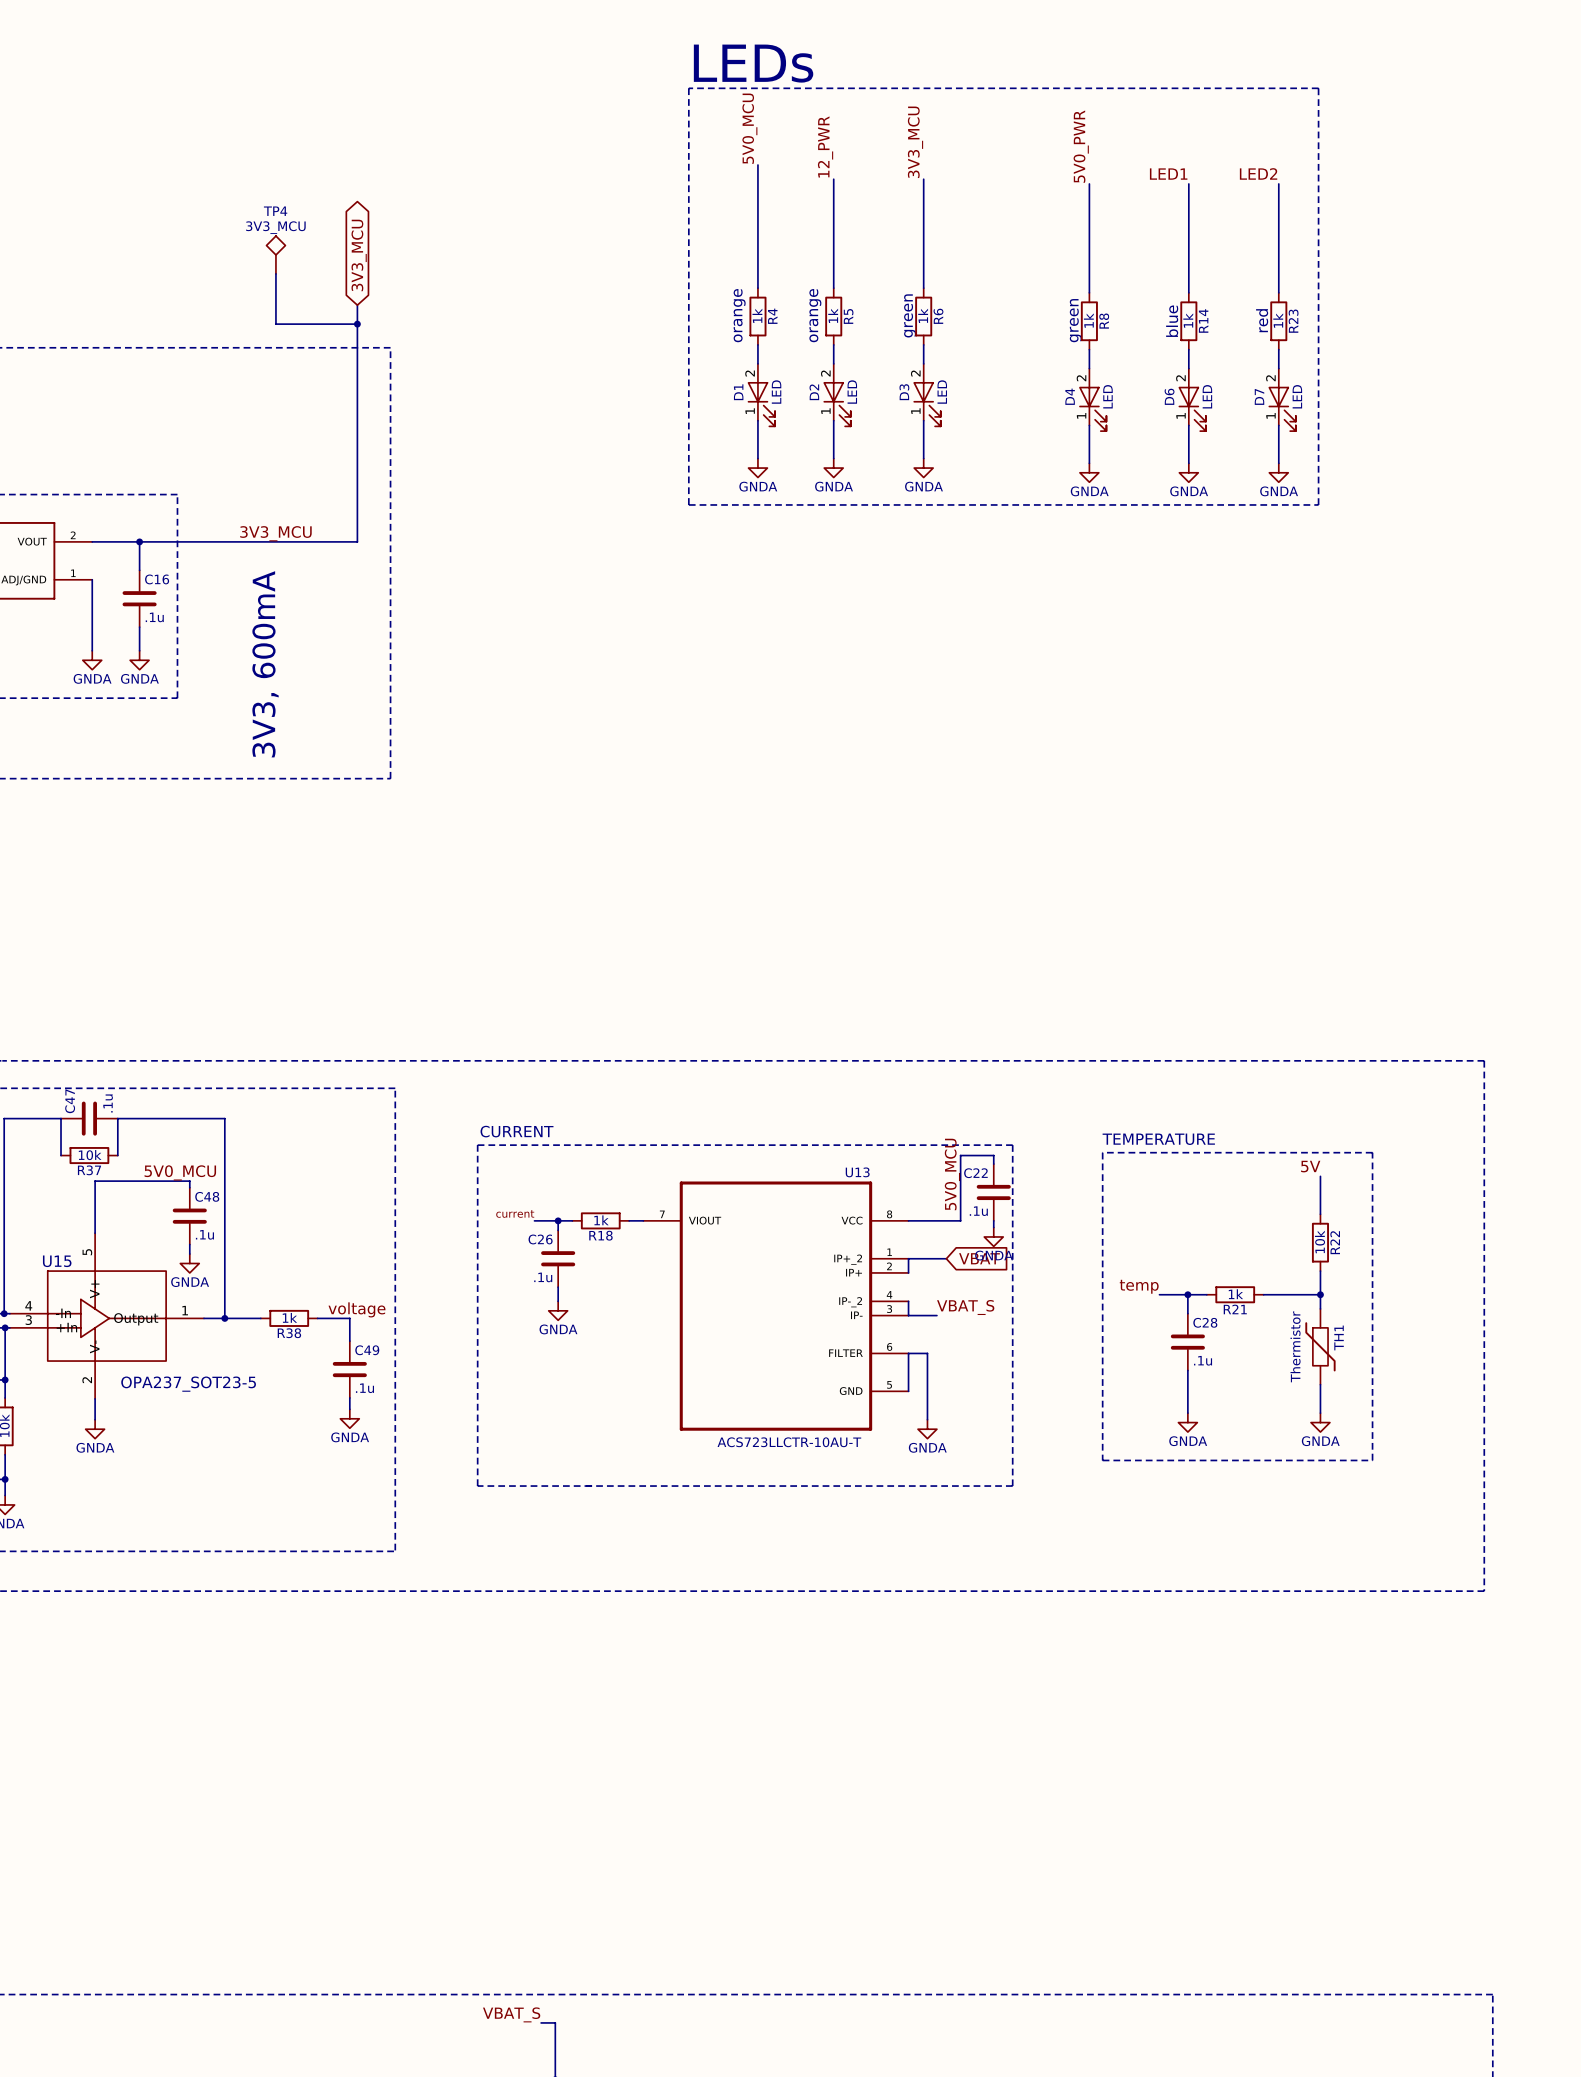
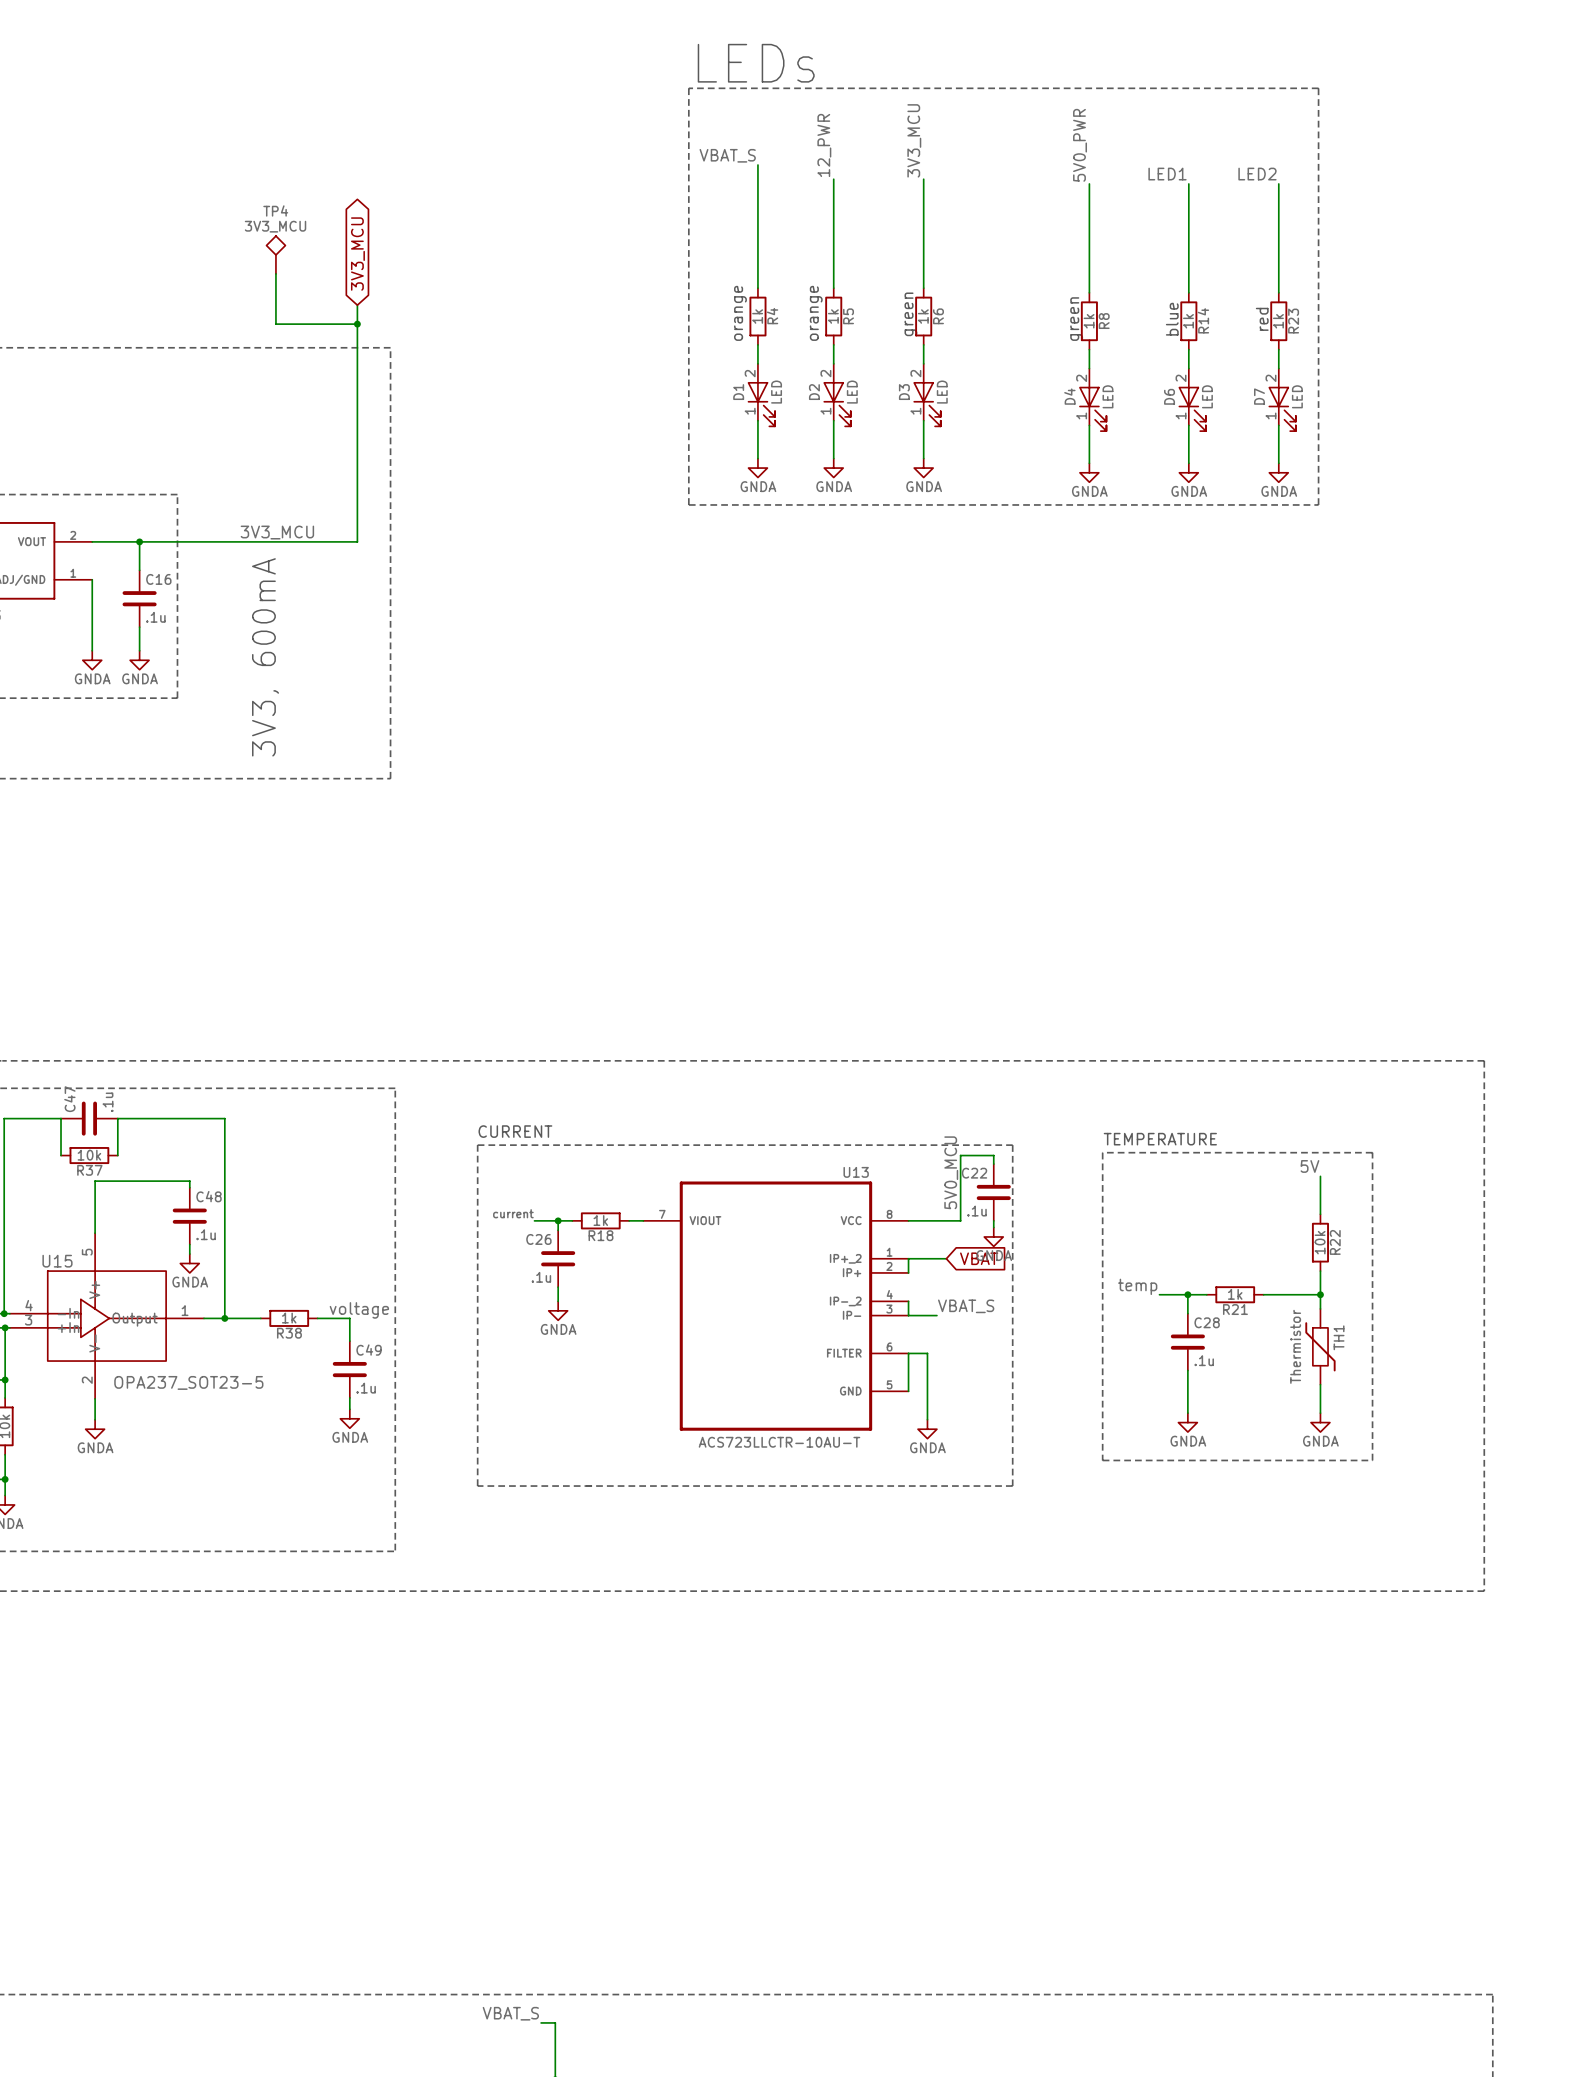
label: 5V0_MCU (749, 128) -> VBAT_S (727, 155)
label: 5V0_MCU (180, 1172) -> none

